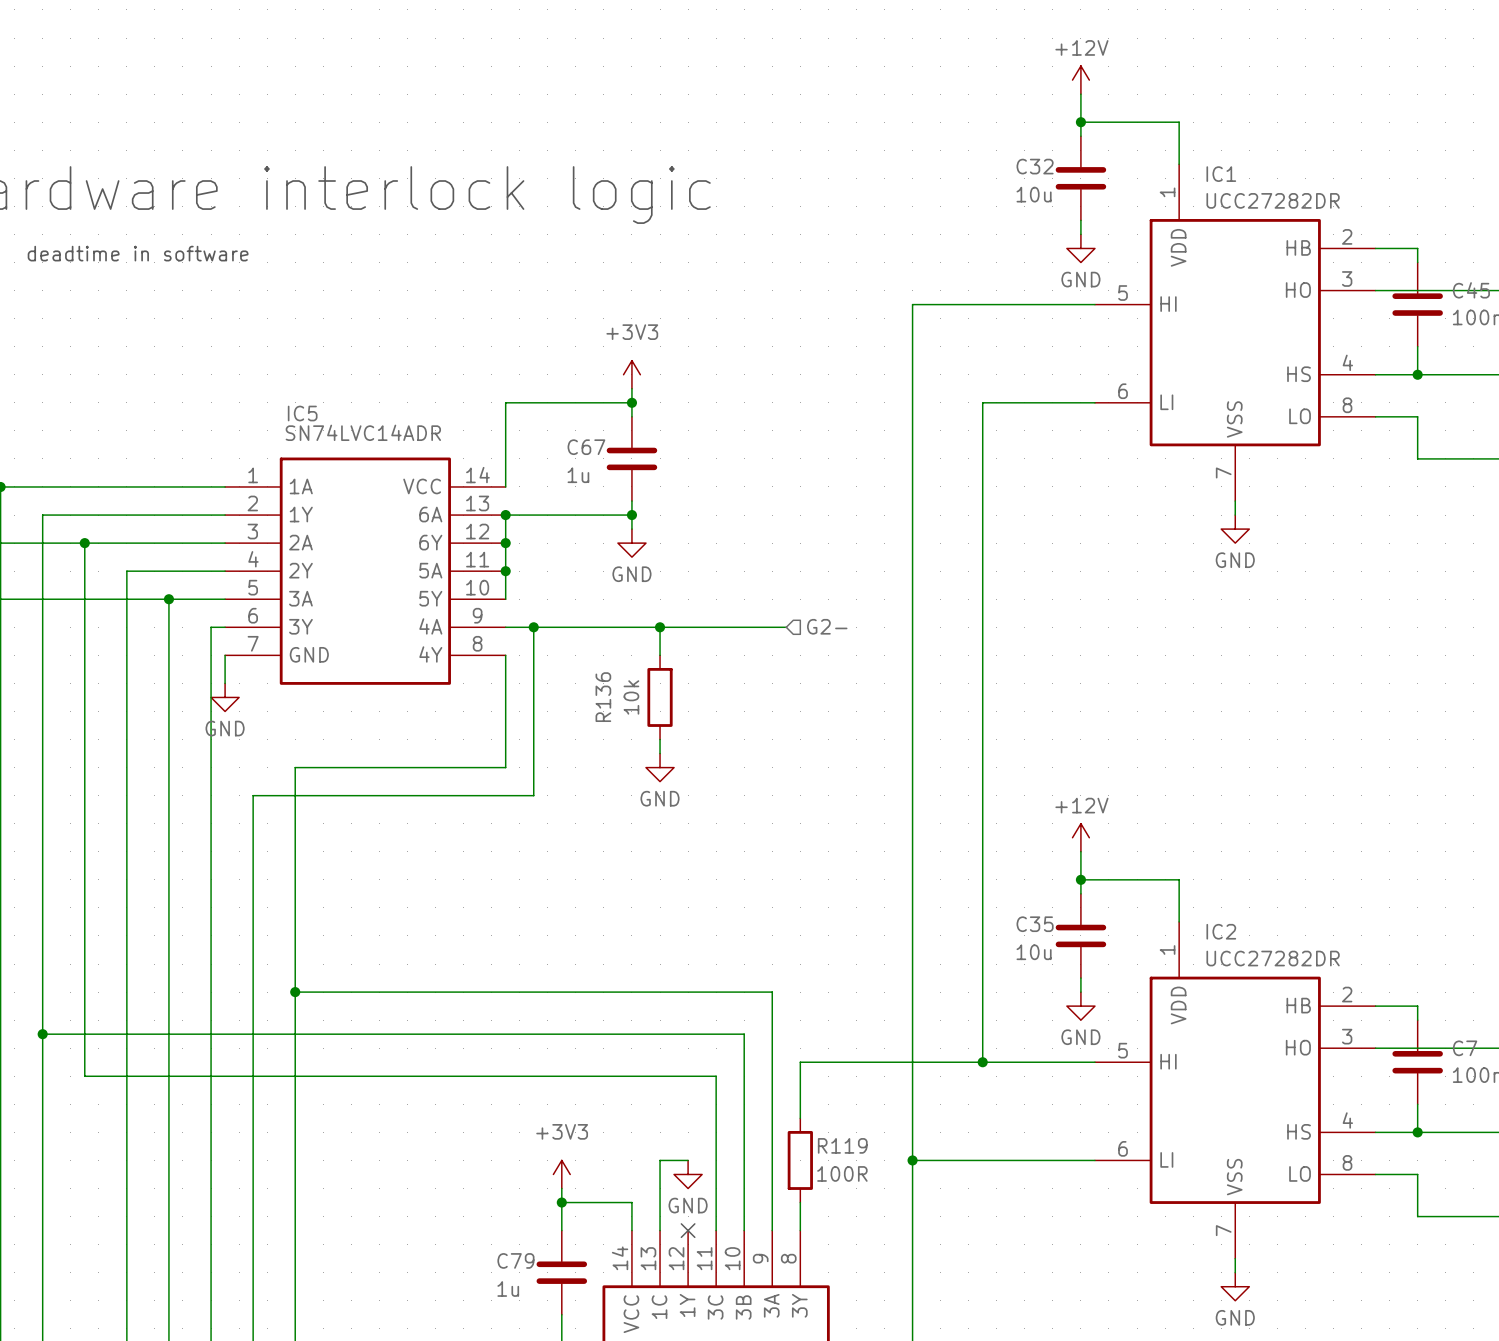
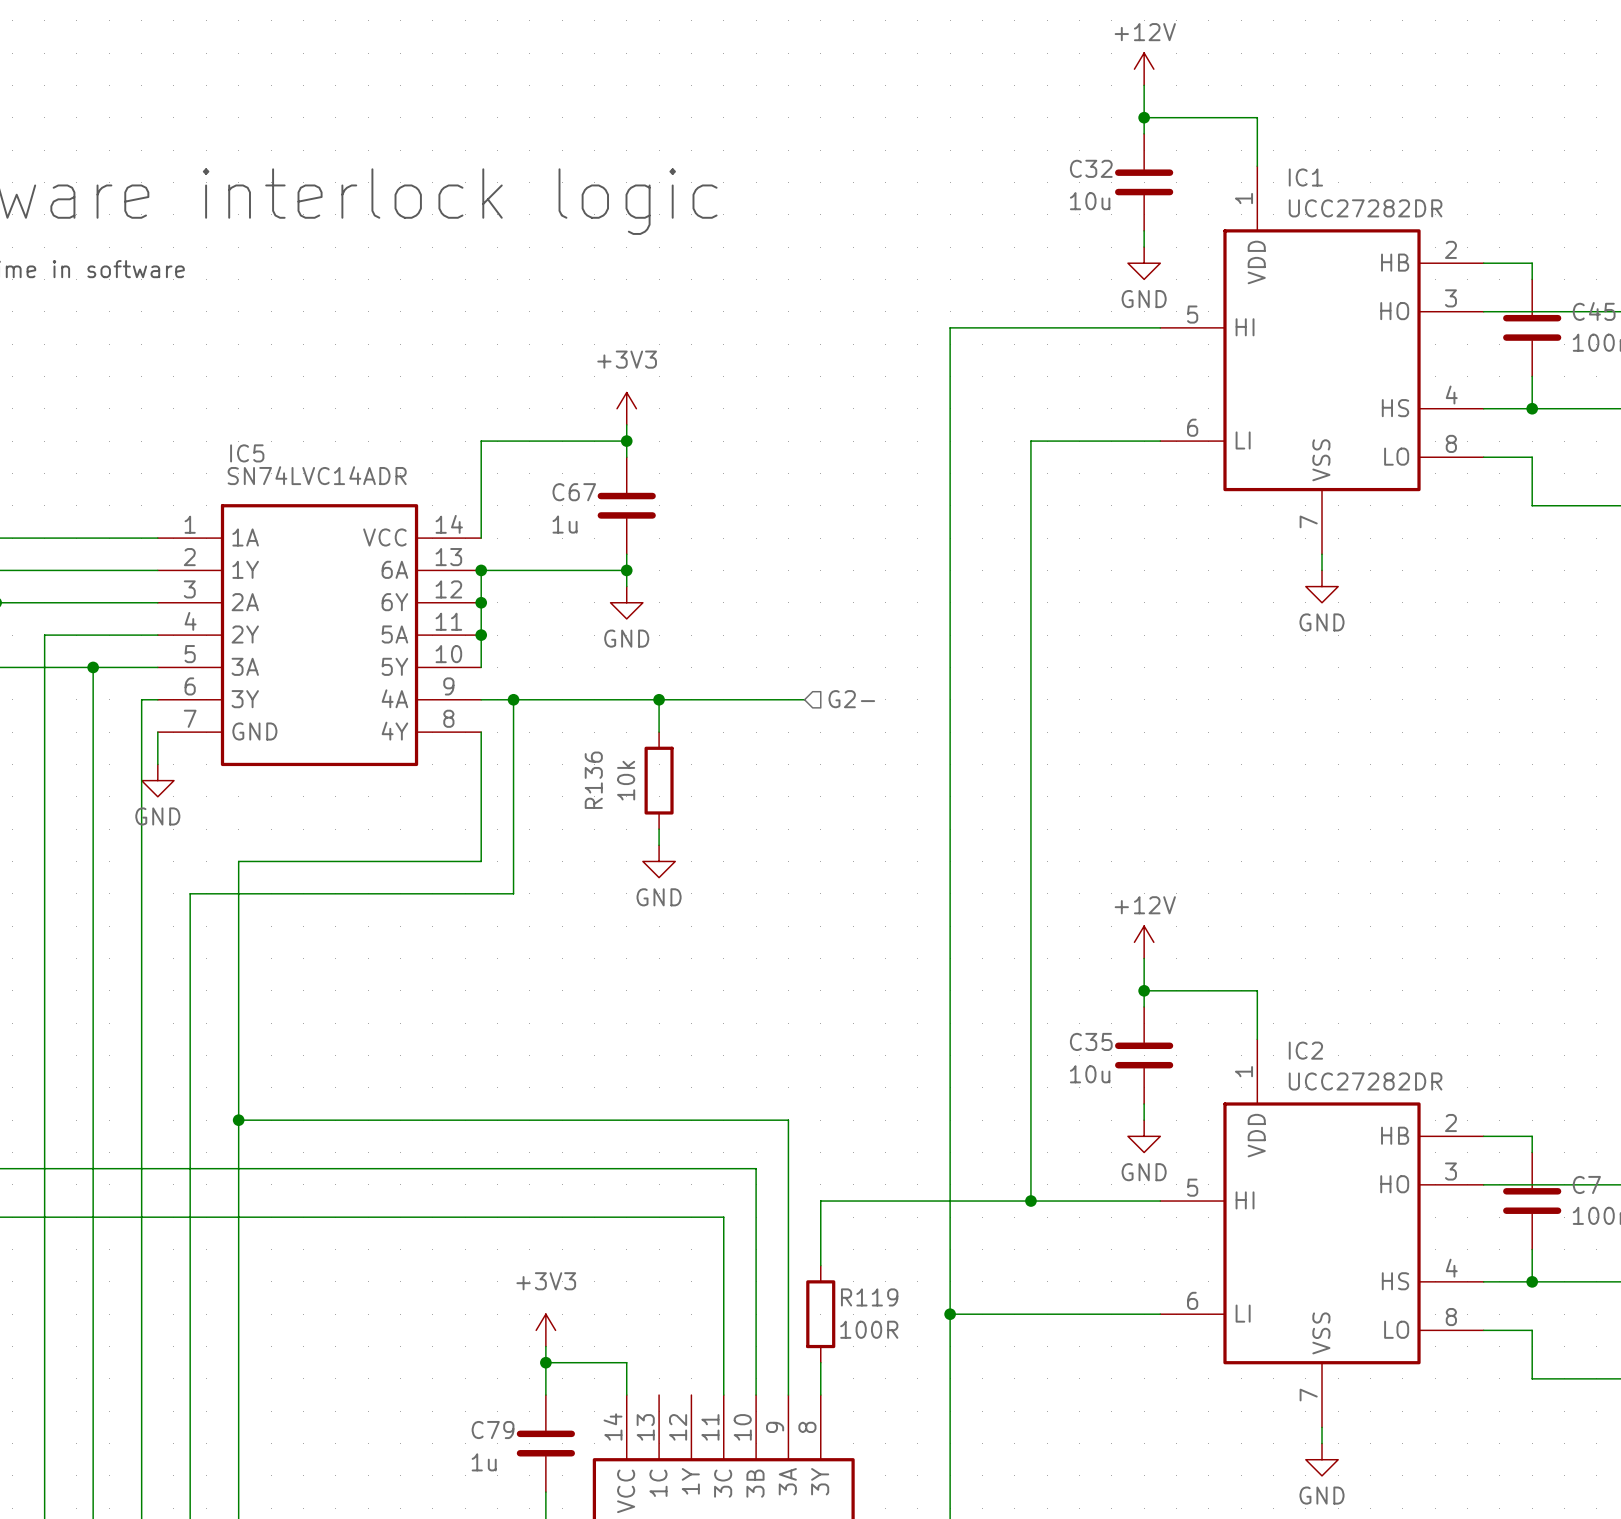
wire: (688, 1160) (660, 1160) (660, 1230) -> none
power symbol: GND (688, 1174) -> none
no-connect mark: (688, 1230) -> none

